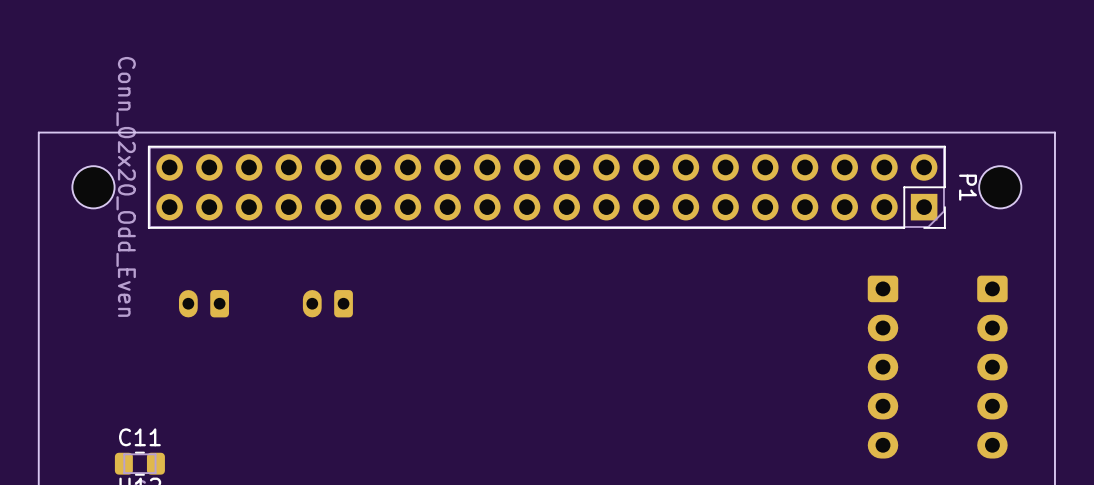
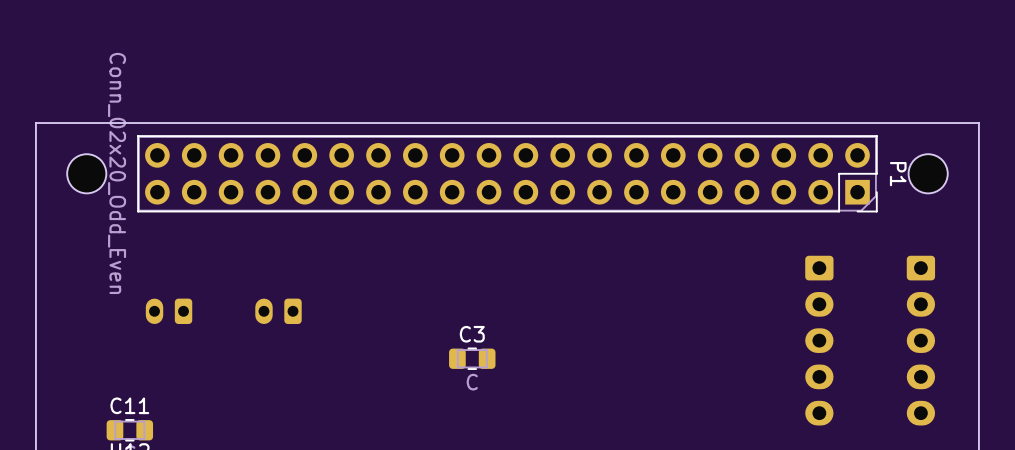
part: (203, 303) -> none
part: (327, 303) -> none
part: none -> (169, 311)
part: none -> (278, 311)
C3: none -> C (472, 358)

